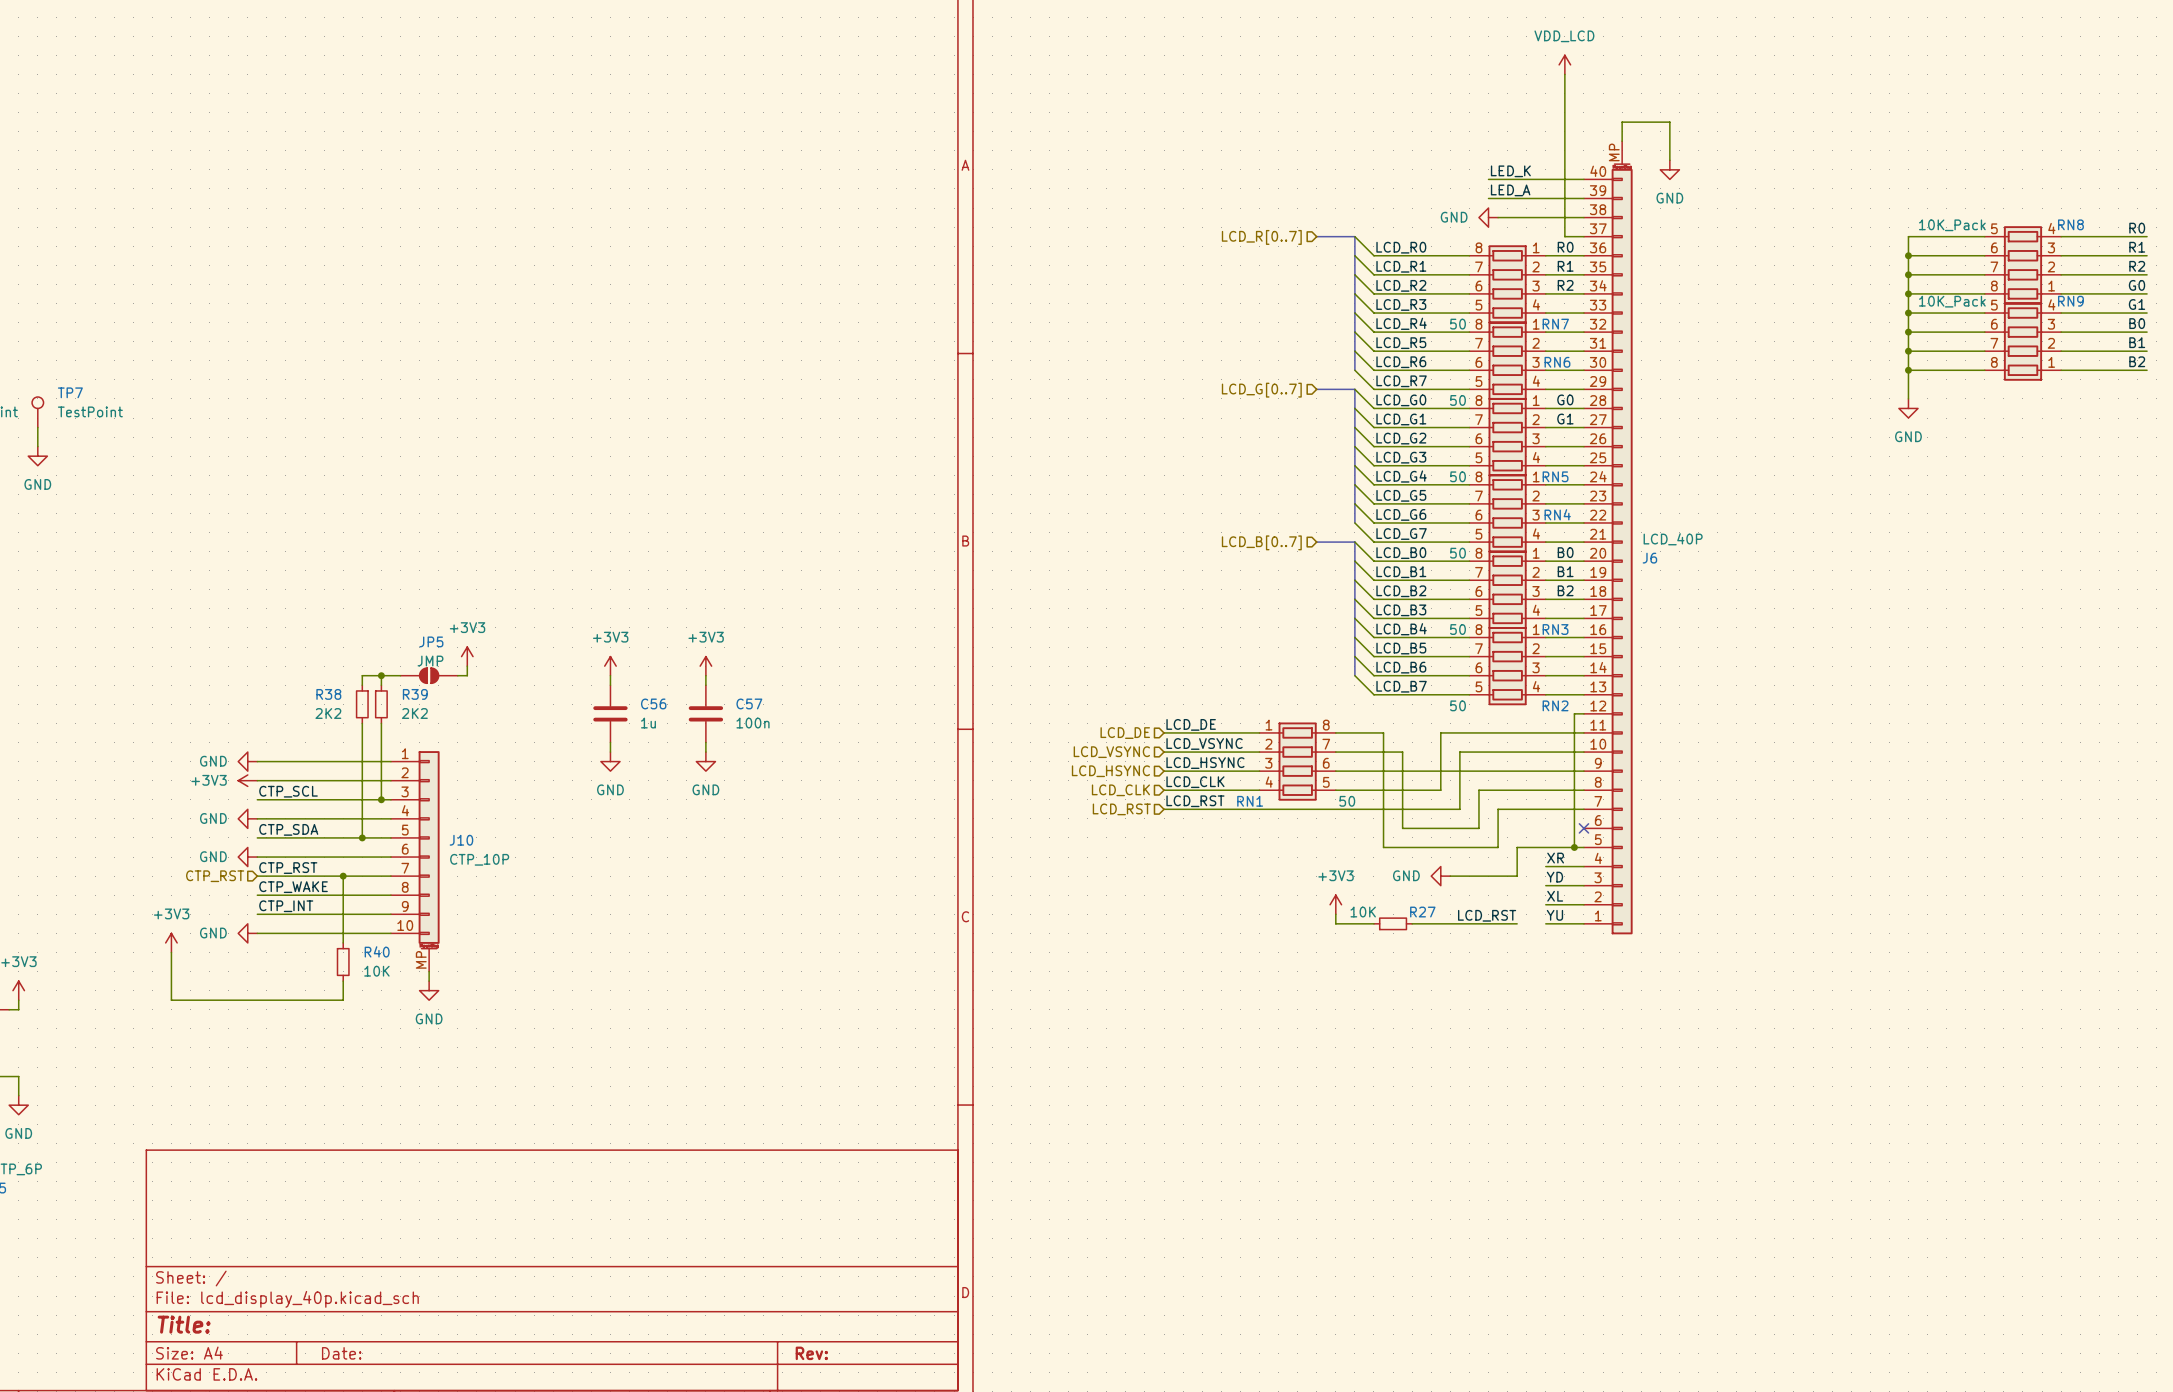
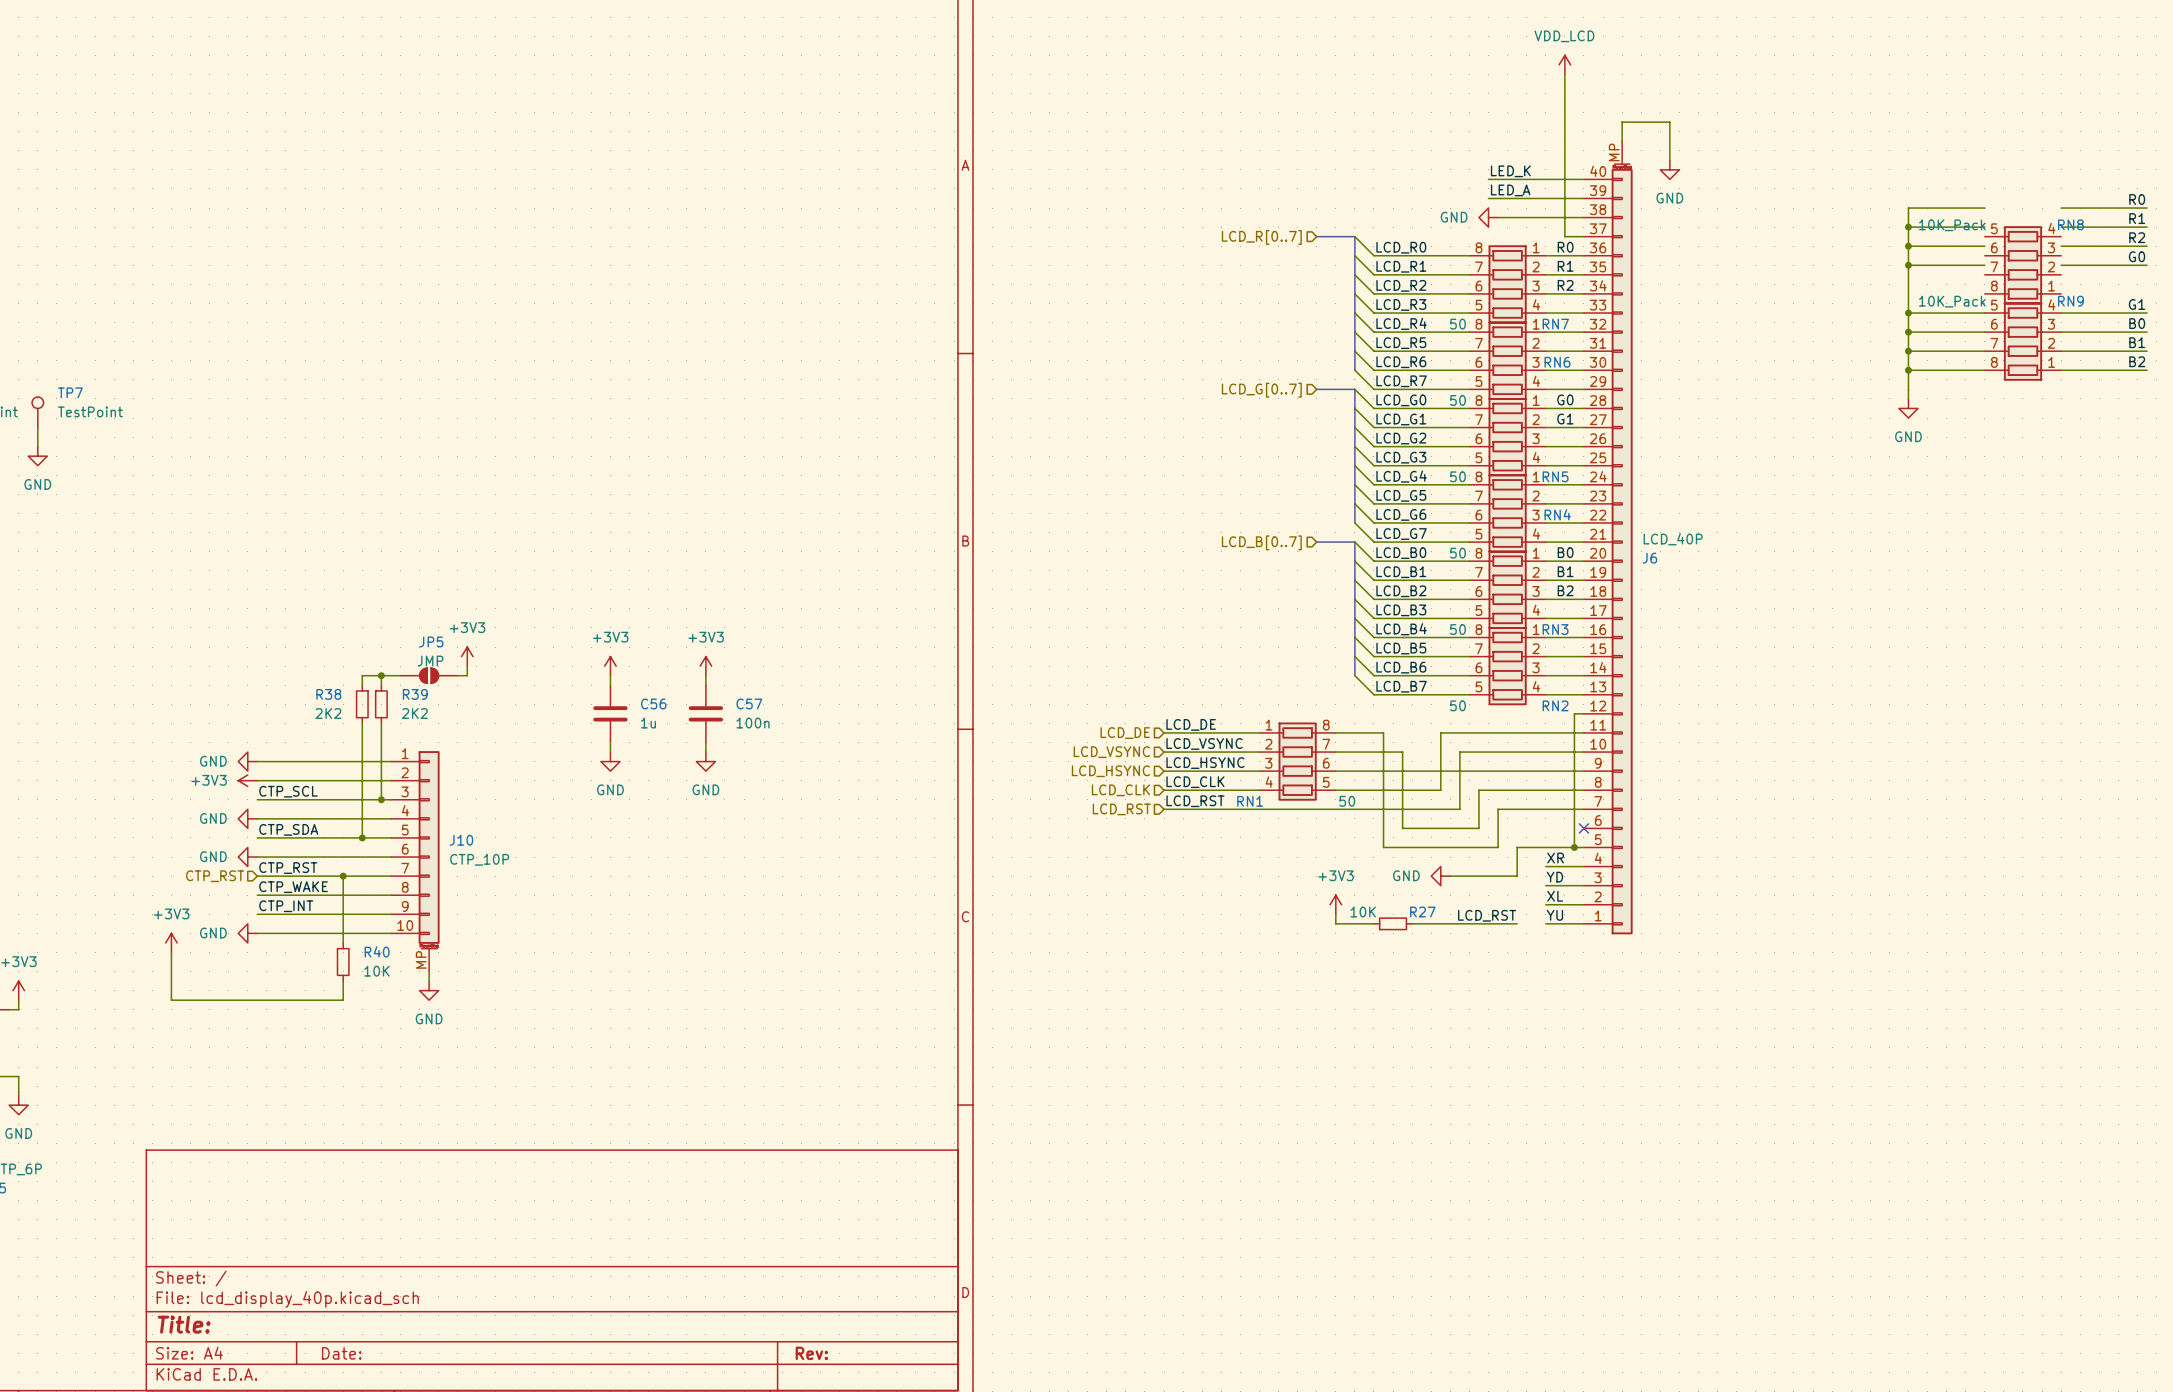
junction: none -> (1908, 227)
label position: R0 (2137, 228) -> R0 (2137, 199)
wire: (1908, 236) (1984, 236) -> (1908, 236) (1908, 208) (1984, 208)
wire: (2061, 236) (2147, 236) -> (2061, 208) (2147, 208)
junction: none -> (1908, 246)
label position: R1 (2137, 247) -> R1 (2137, 218)
wire: (1908, 255) (1984, 255) -> (1908, 227) (1984, 227)
junction: (1908, 255) -> none
wire: (2061, 255) (2147, 255) -> (2061, 227) (2147, 227)
junction: none -> (1908, 265)
label position: R2 (2137, 266) -> R2 (2137, 237)
wire: (1908, 274) (1984, 274) -> (1908, 246) (1984, 246)
junction: (1908, 274) -> none
wire: (2061, 274) (2147, 274) -> (2061, 246) (2147, 246)
label position: G0 (2136, 285) -> G0 (2136, 256)
wire: (1908, 293) (1984, 293) -> (1908, 265) (1984, 265)
junction: (1908, 293) -> none
wire: (2061, 293) (2147, 293) -> (2061, 265) (2147, 265)

